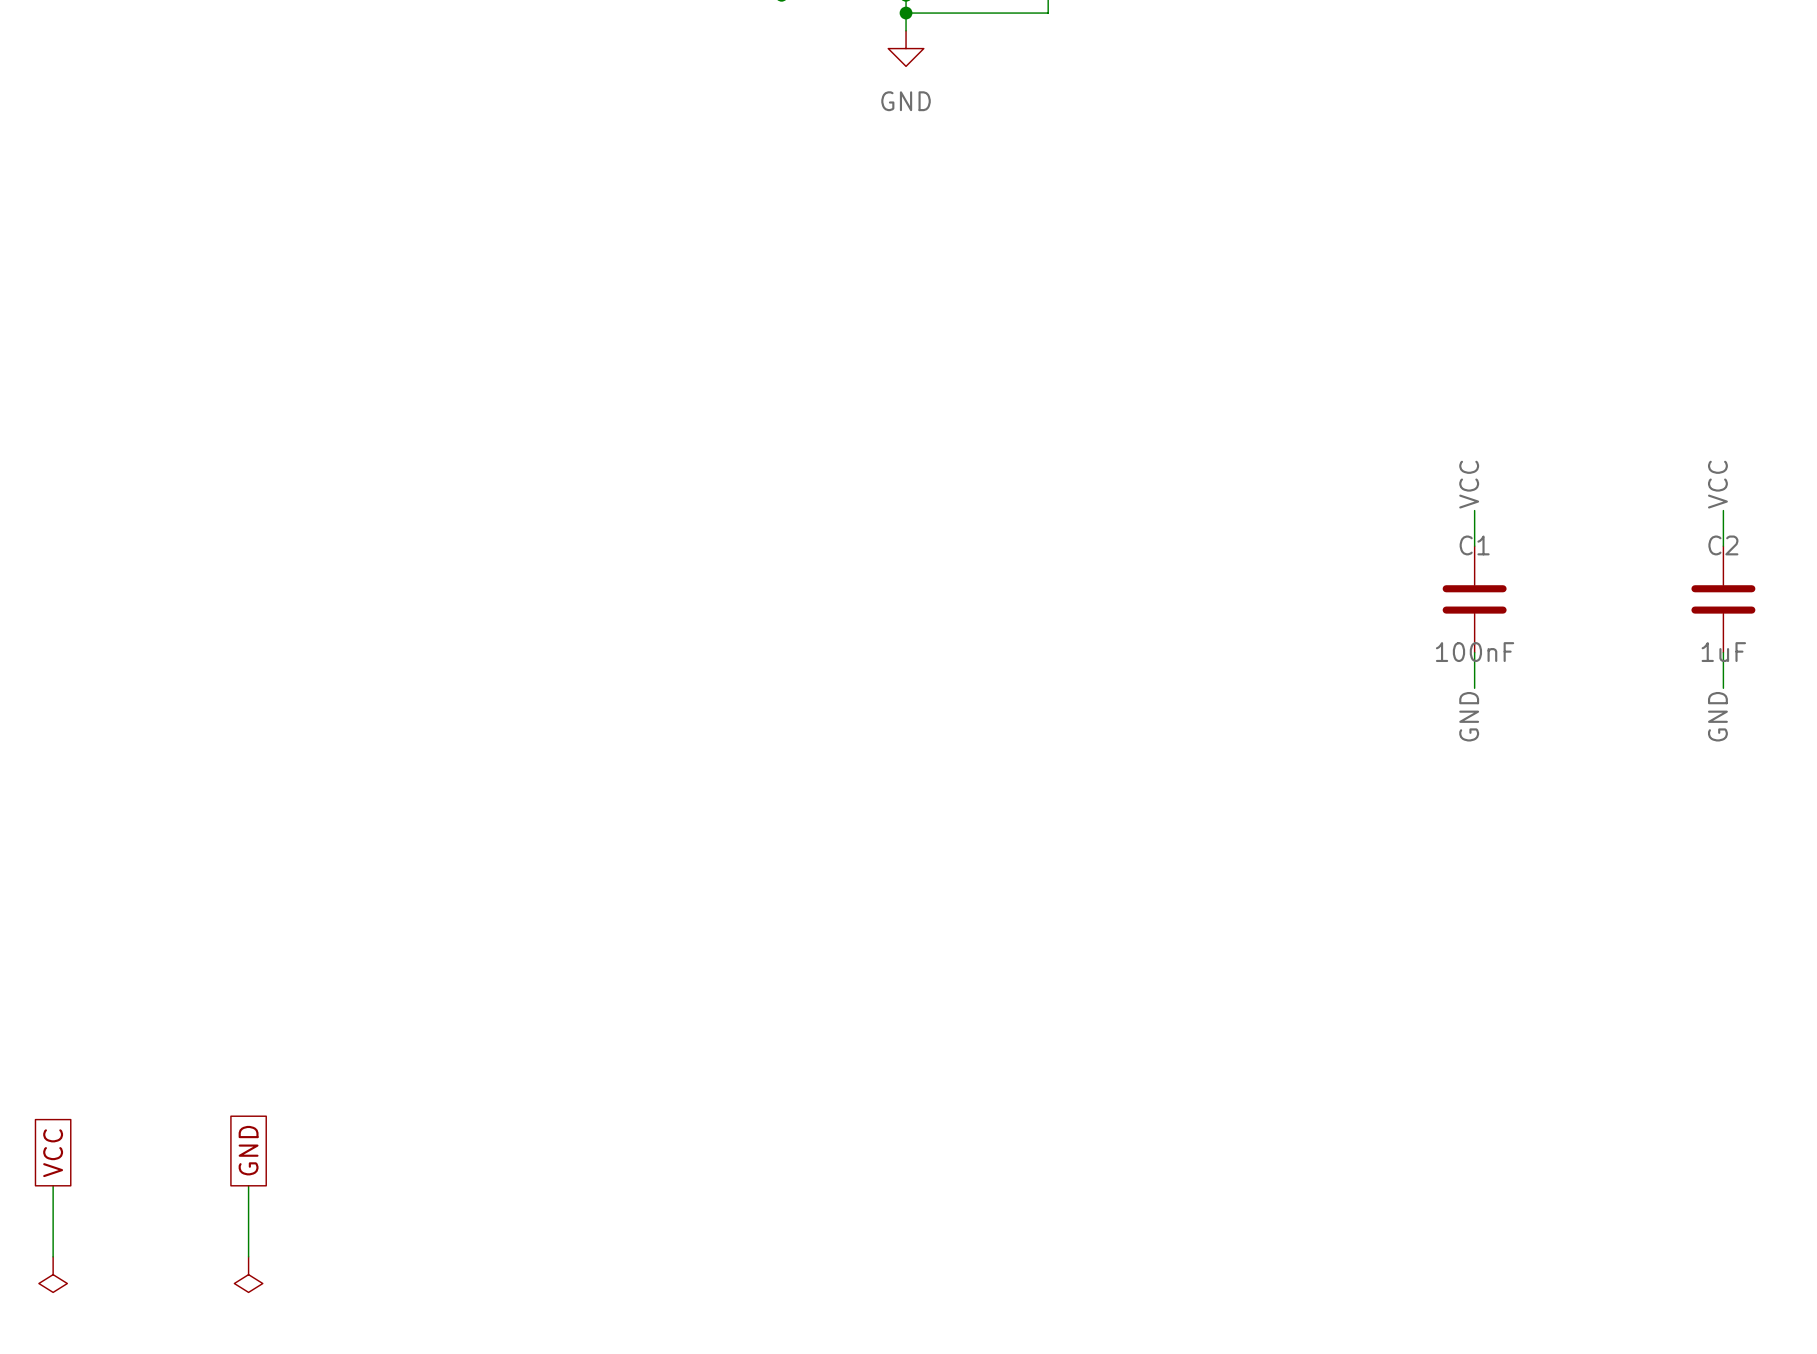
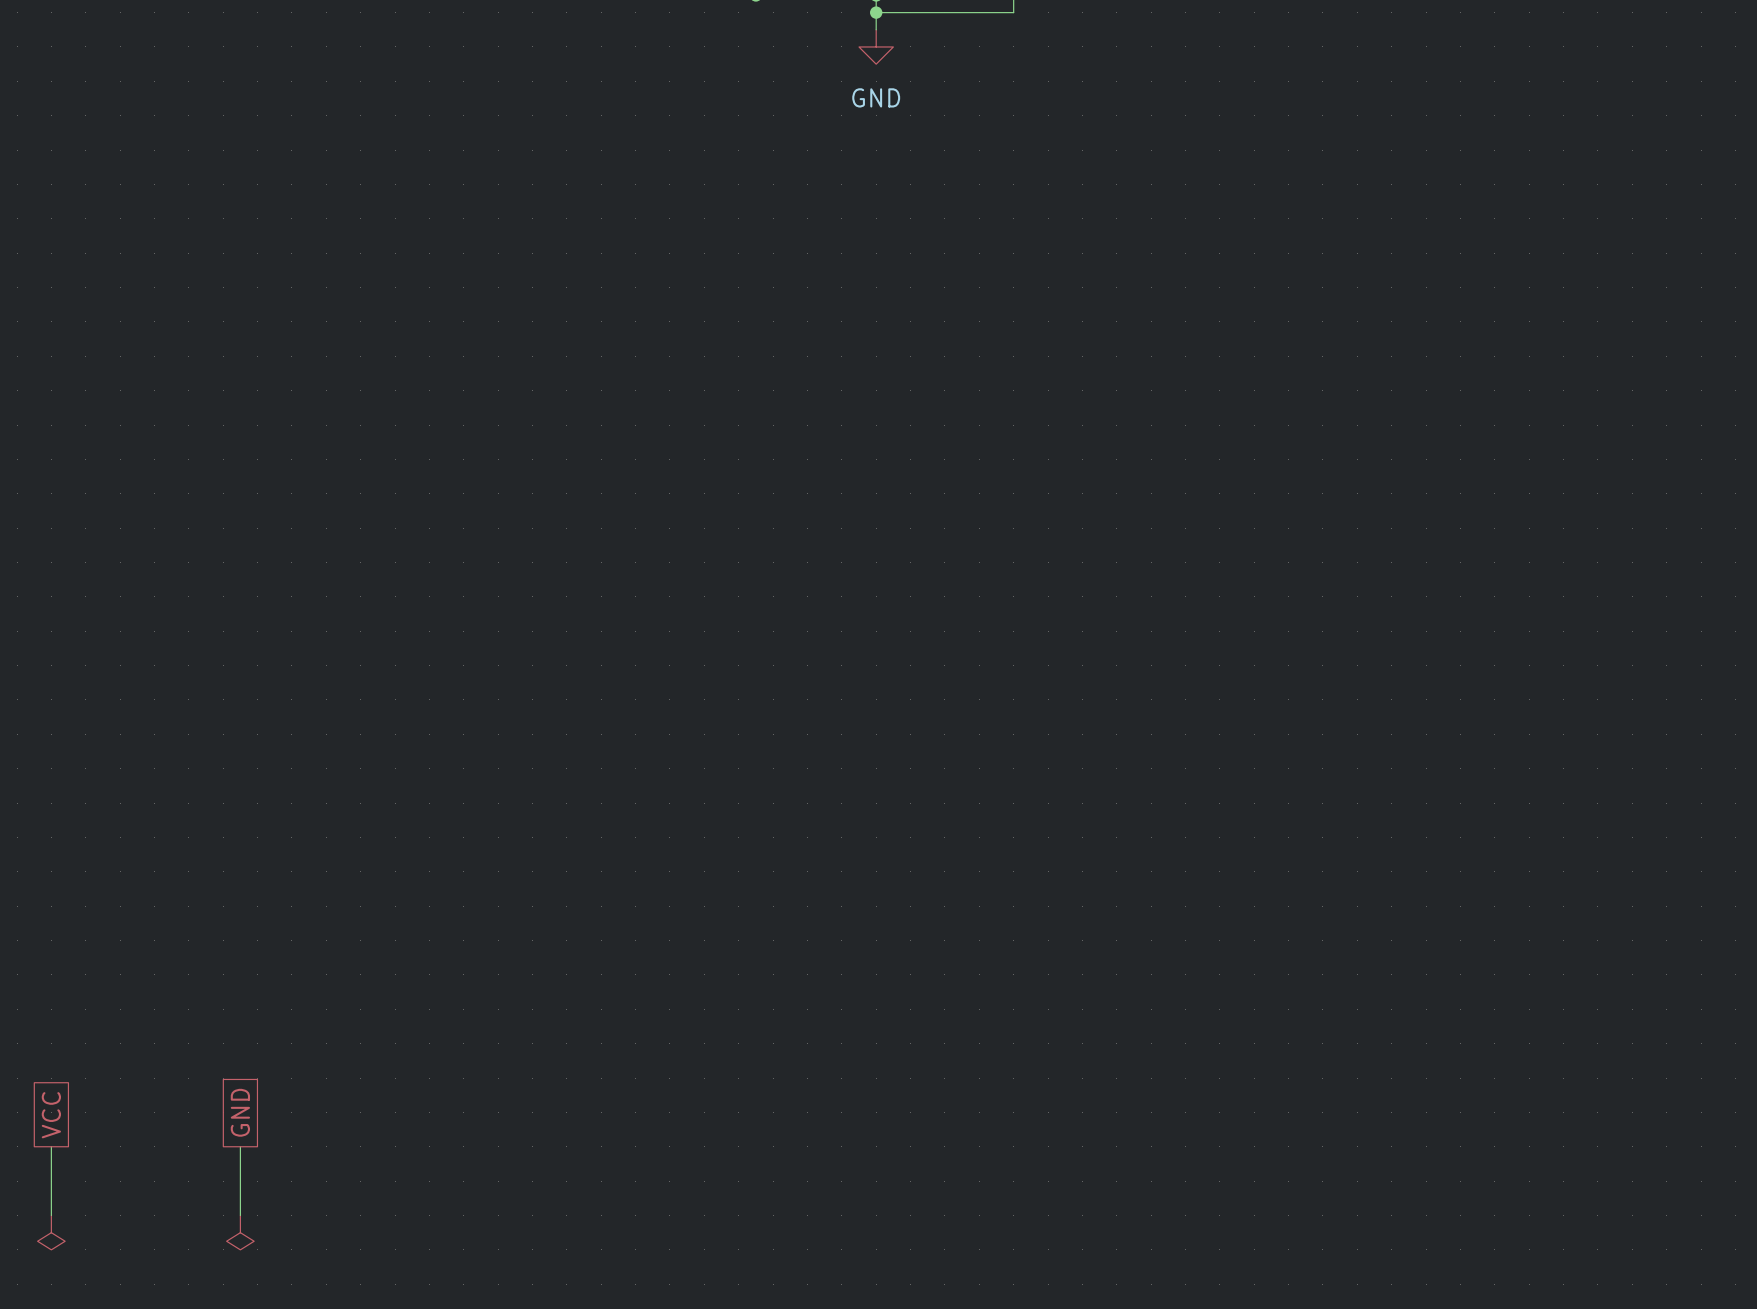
label: VCC (1469, 484) -> none
label: VCC (1717, 484) -> none
wire: (1474, 510) (1474, 546) -> none
wire: (1723, 510) (1723, 546) -> none
C1: 100nF (1474, 599) -> none
C2: 1uF (1723, 599) -> none
wire: (1474, 652) (1474, 688) -> none
wire: (1723, 652) (1723, 688) -> none
label: GND (1469, 716) -> none
label: GND (1717, 716) -> none

